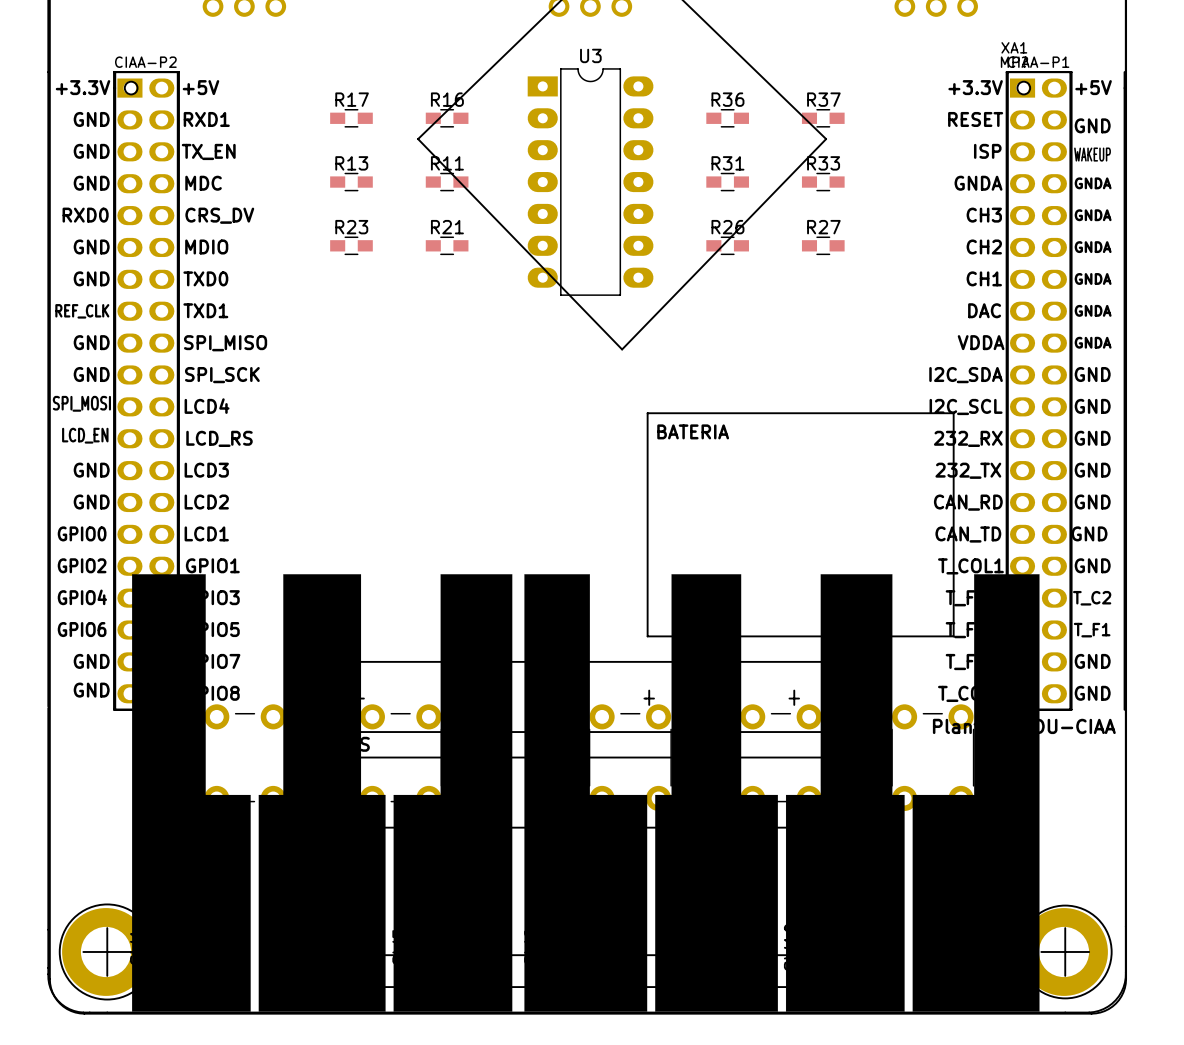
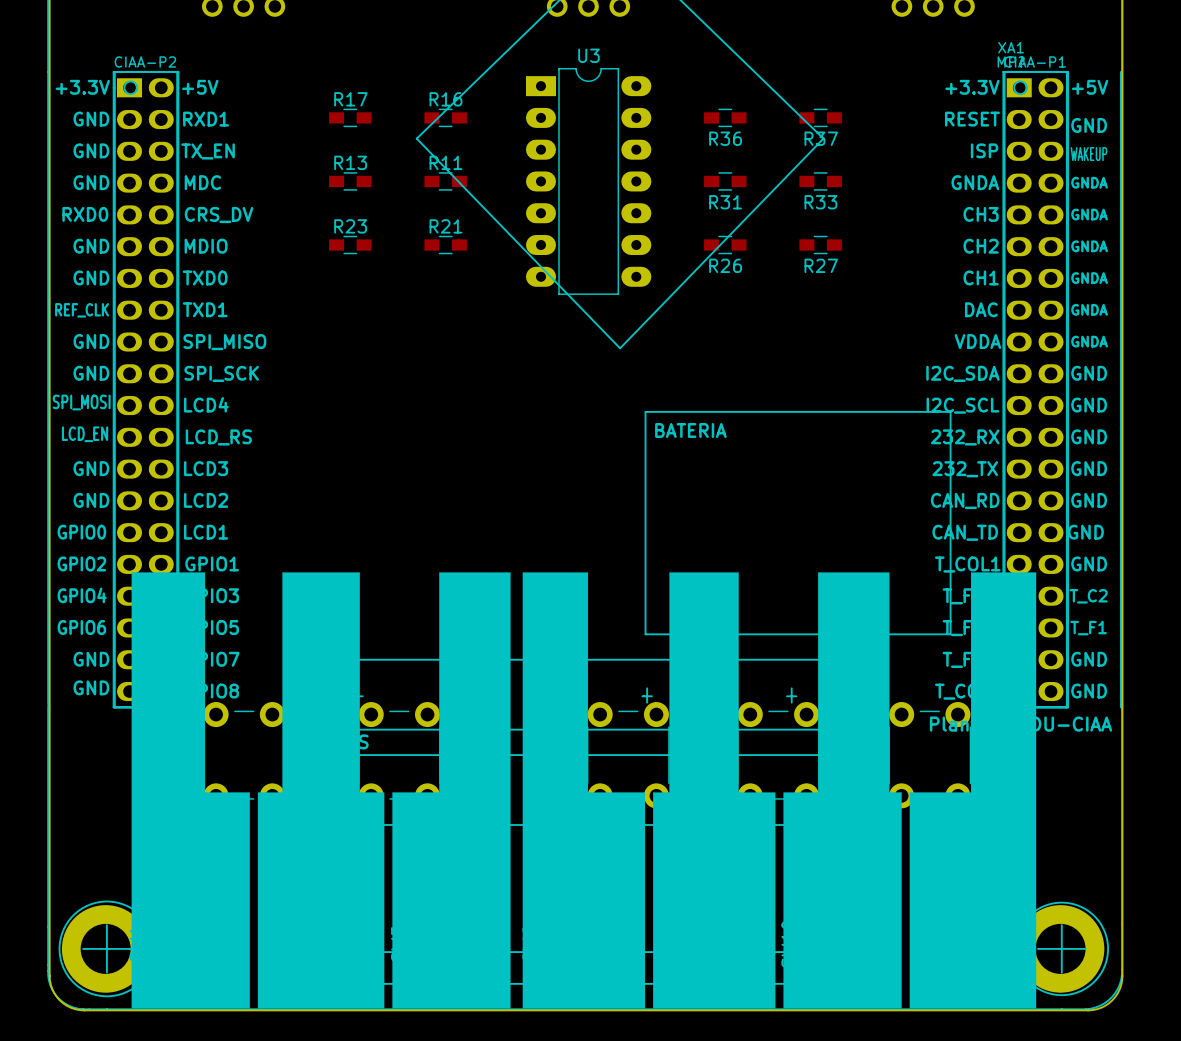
R36 name position: R36 (727, 99) -> R36 (725, 138)
R37 name position: R37 (823, 99) -> R37 (821, 138)
R31 name position: R31 (727, 163) -> R31 (725, 202)
R33 name position: R33 (823, 163) -> R33 (820, 202)
R26 name position: R26 (727, 227) -> R26 (725, 265)
R27 name position: R27 (823, 227) -> R27 (821, 265)

